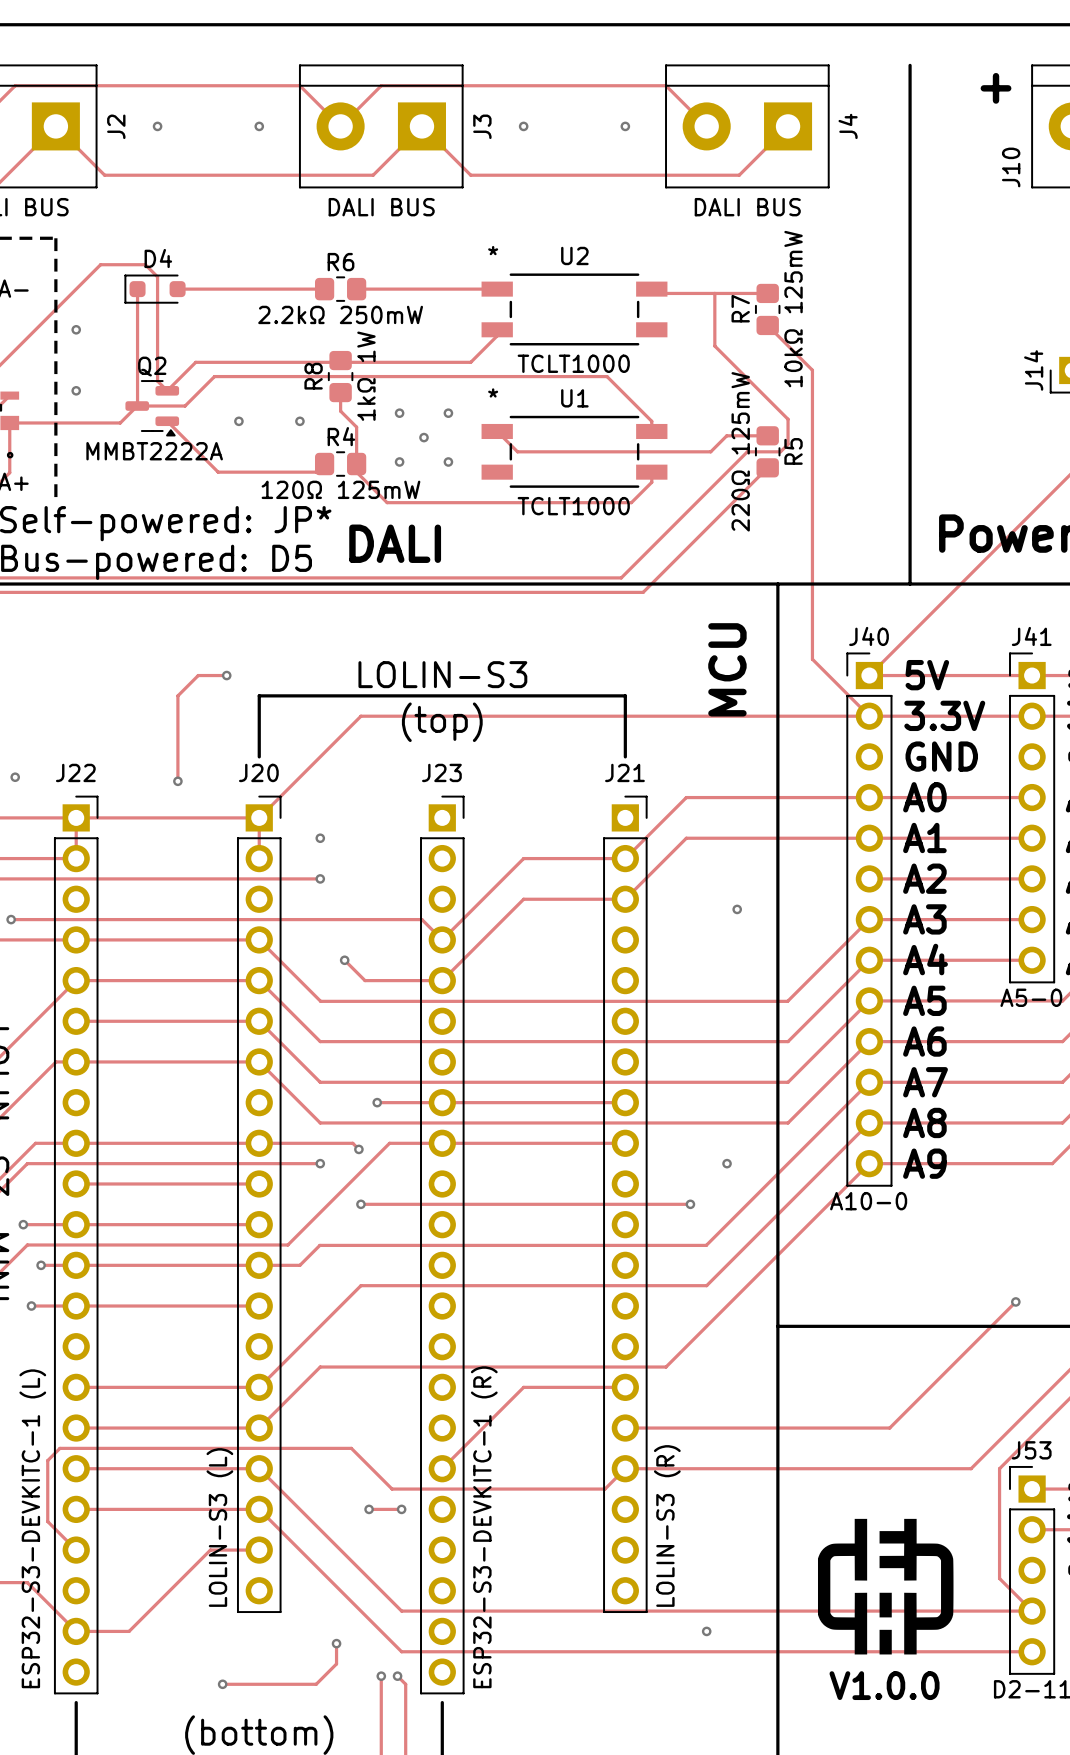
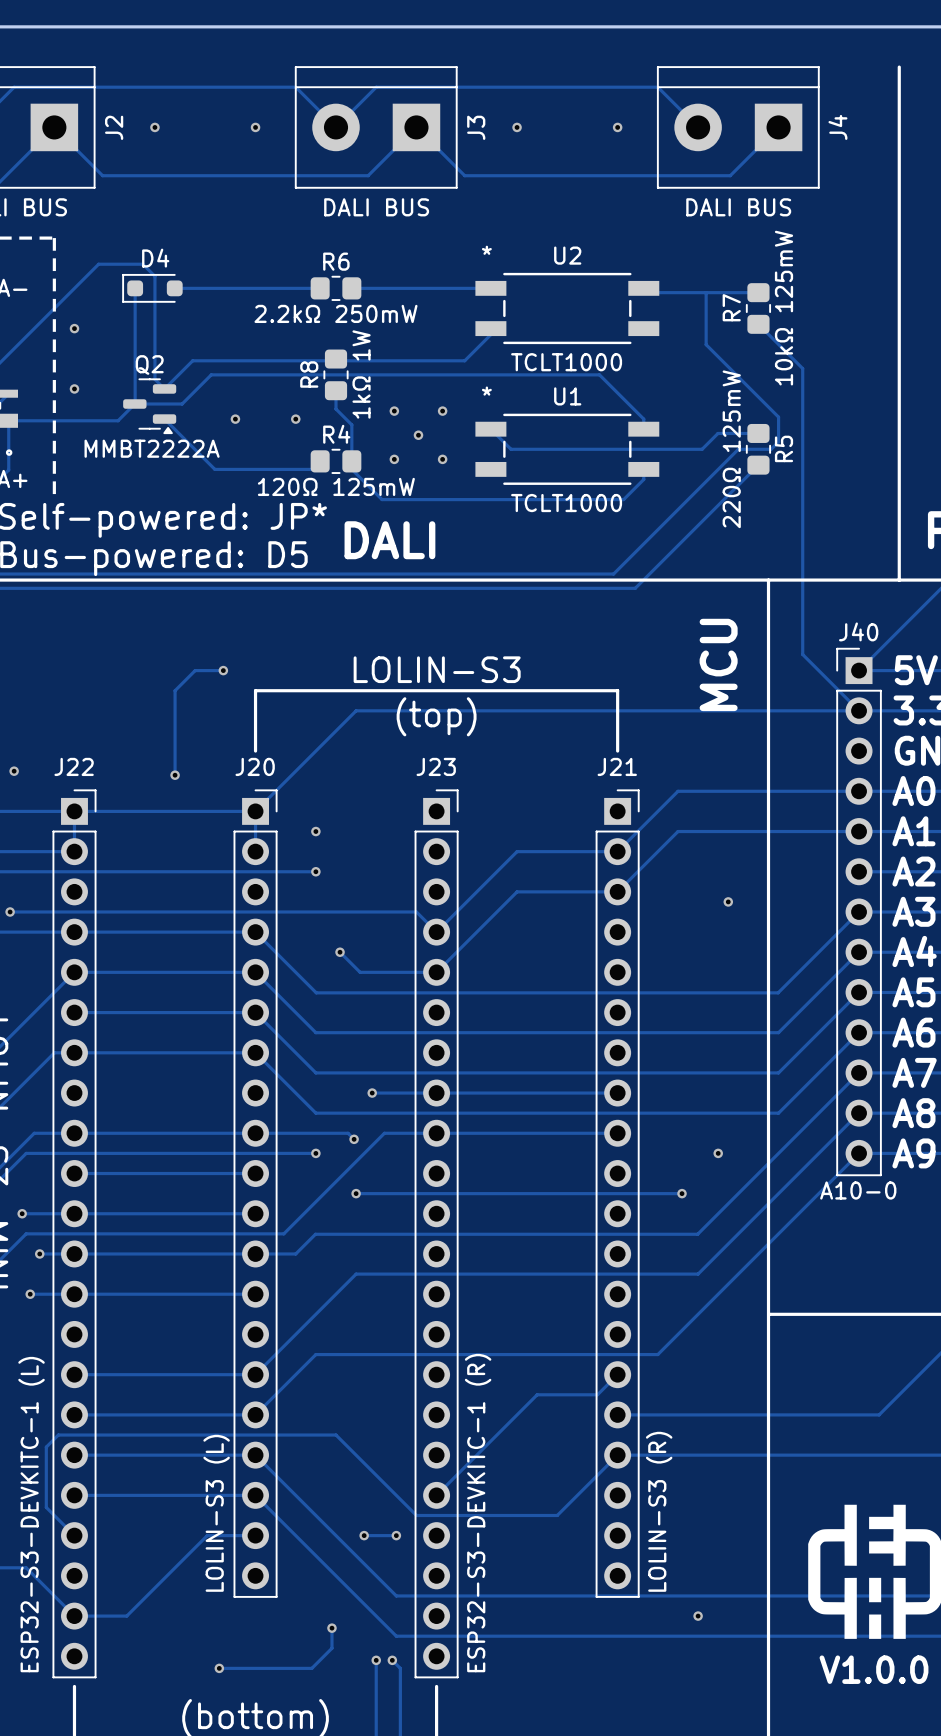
track: (625, 1387) (523, 1387) (442, 1468) -> (617, 1374) (597, 1394) (537, 1394) (436, 1495)
track: (340, 1448) (351, 1448) (392, 1489) (605, 1489) -> (336, 1435) (416, 1515) (557, 1515) (597, 1475)
track: (369, 1509) (401, 1509) -> (364, 1535) (396, 1535)
via: (369, 1509) -> none
via: (401, 1509) -> none
via: none -> (364, 1535)
via: none -> (396, 1535)

